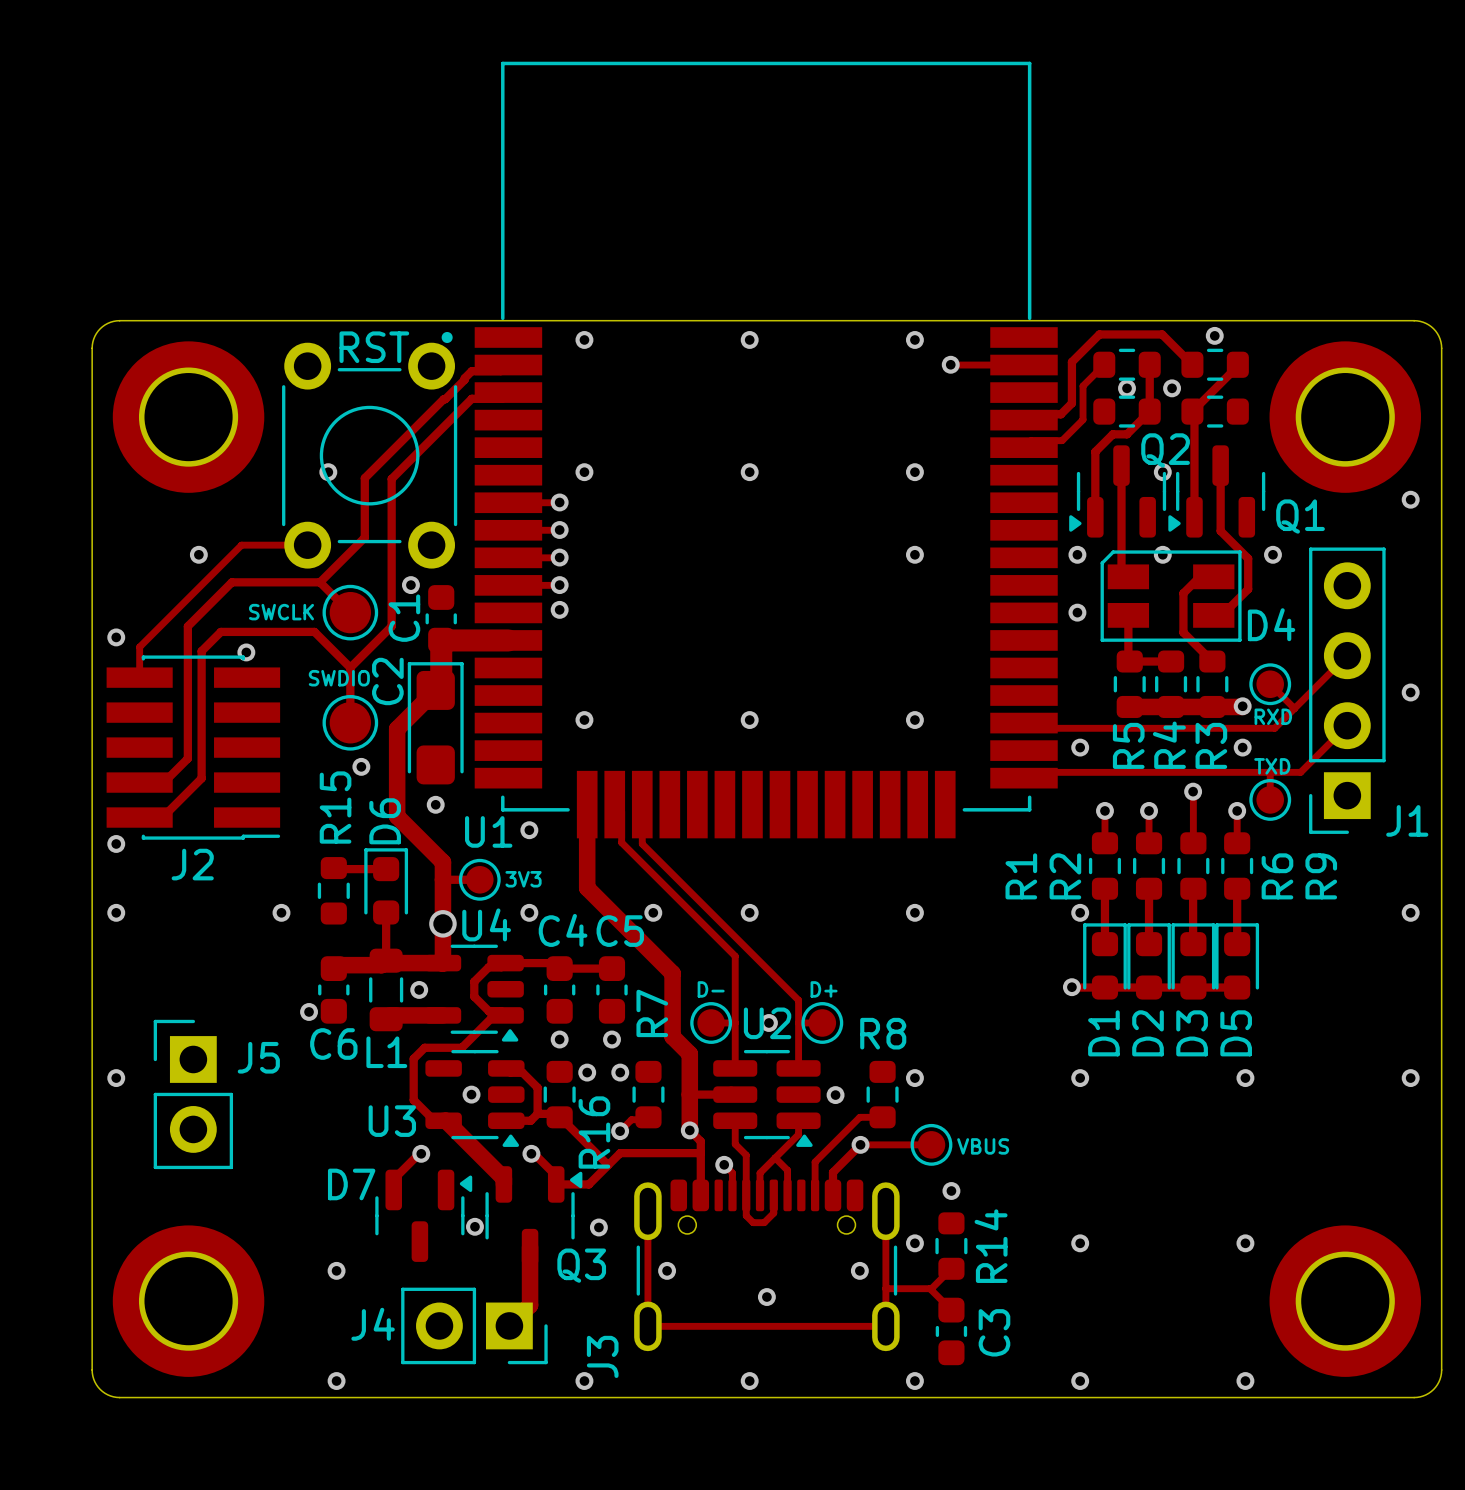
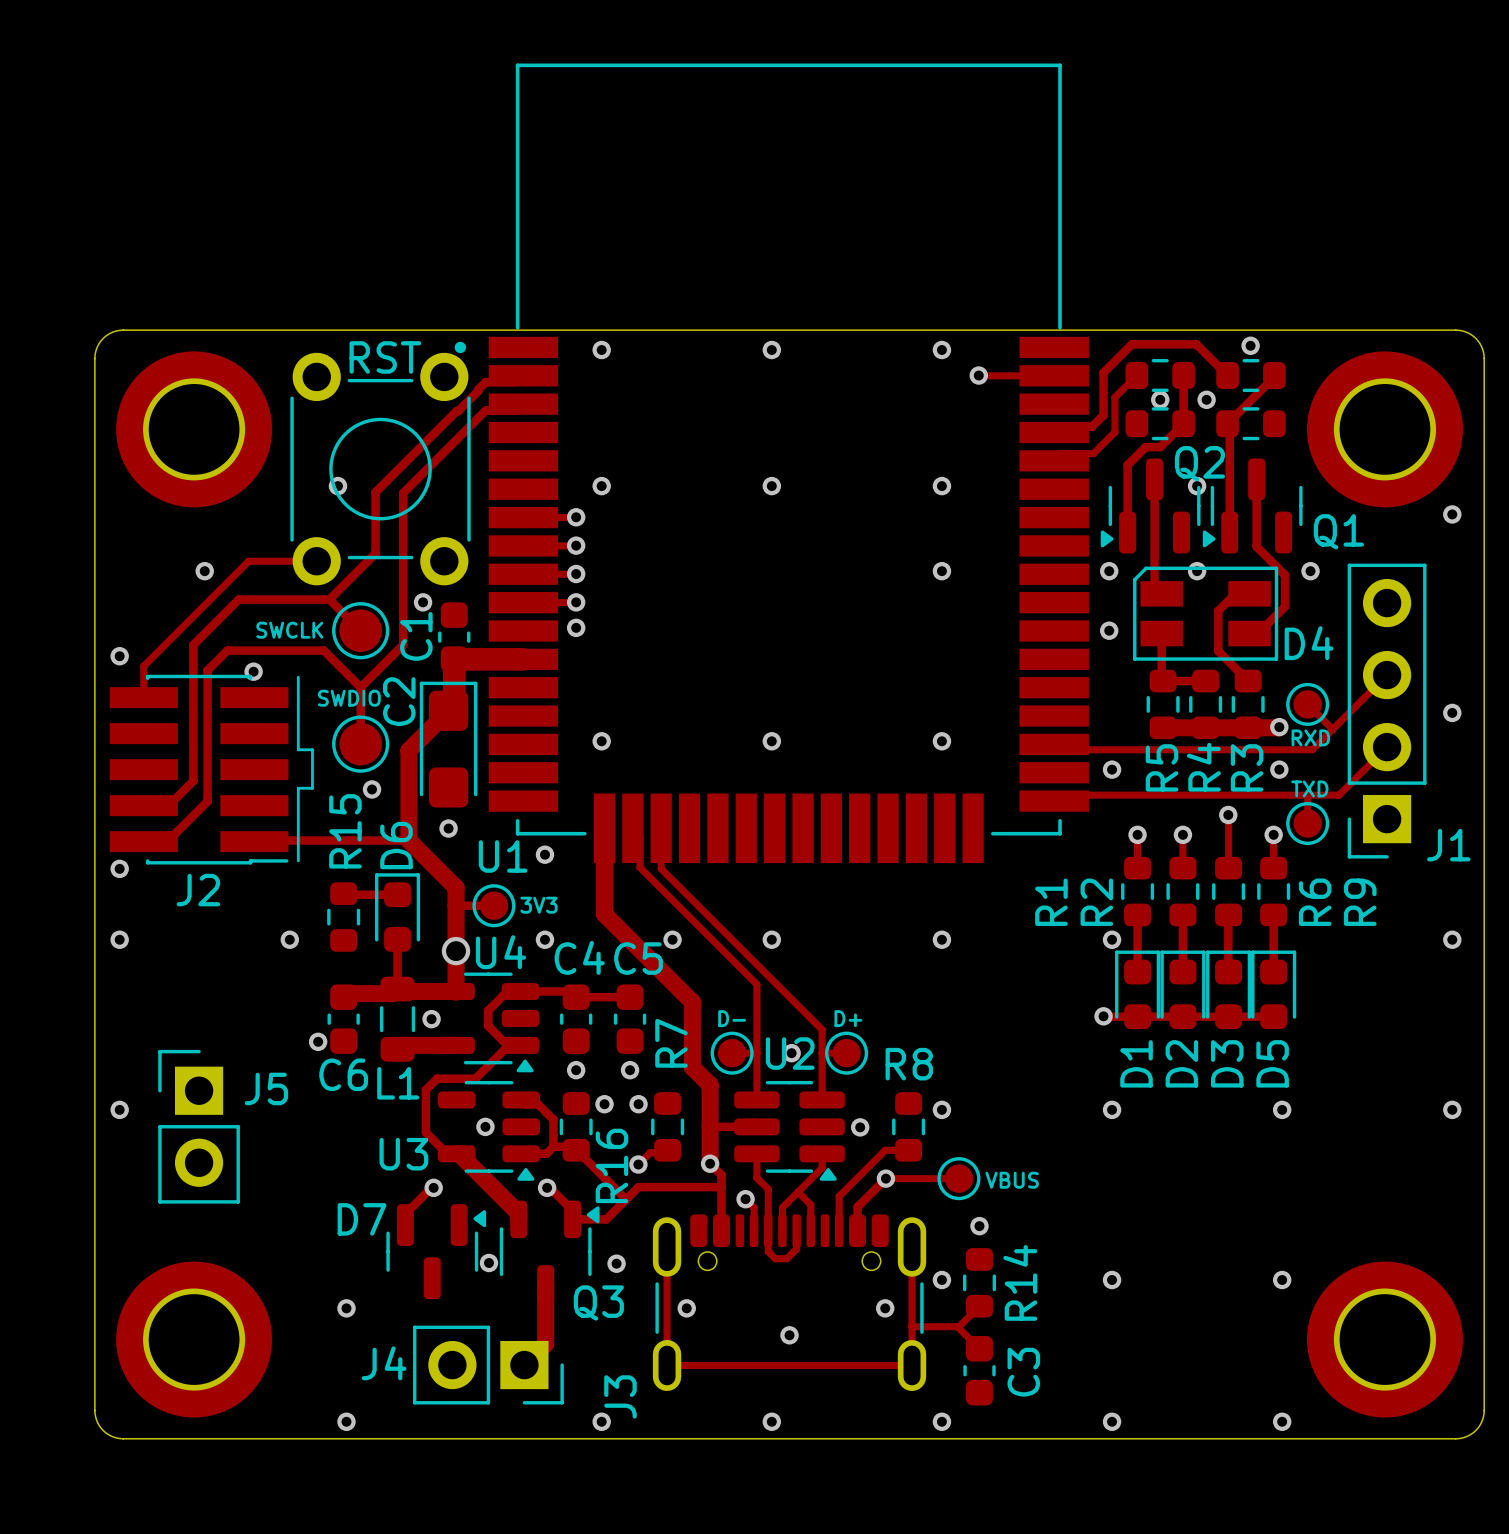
line: none -> (298, 677) (298, 749) (312, 749) (312, 788) (298, 788) (298, 860)
track: none -> (408, 840) (254, 841)

